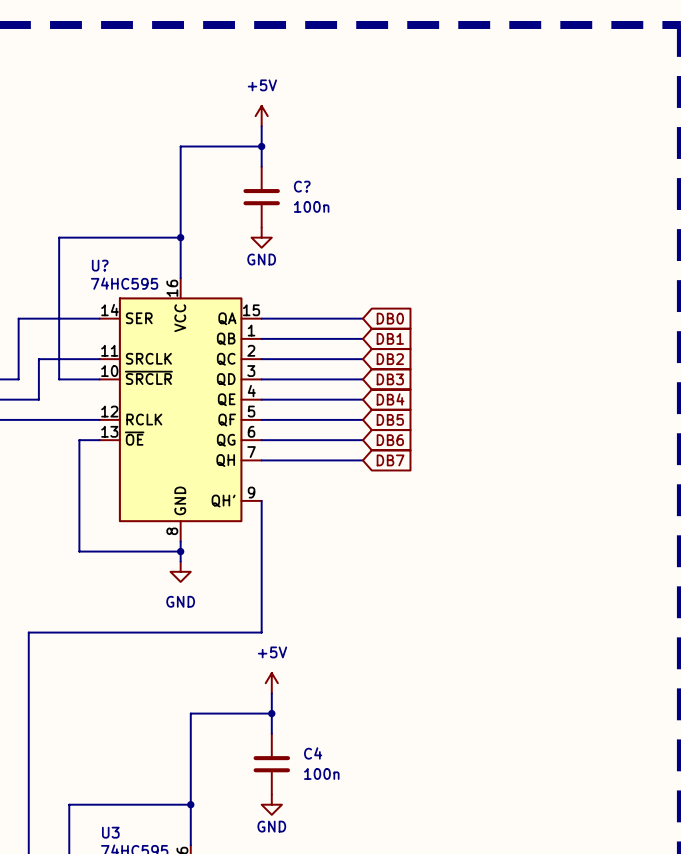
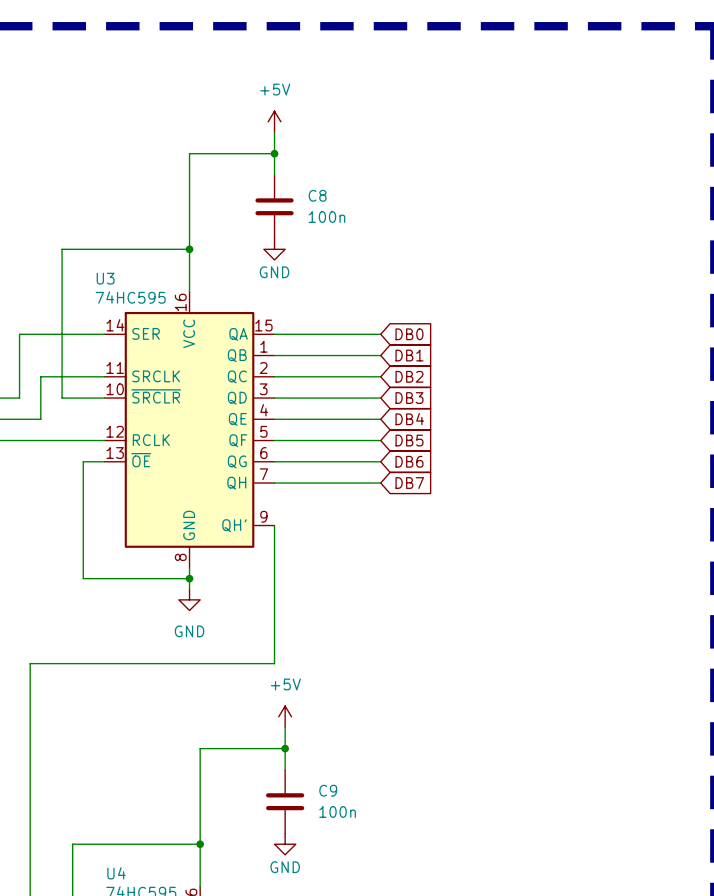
C? name: C? (302, 186) -> C8 (317, 195)
U? name: U? (100, 265) -> U3 (105, 278)
C4 name: C4 (313, 753) -> C9 (328, 790)
U3 name: U3 (110, 832) -> U4 (116, 873)

